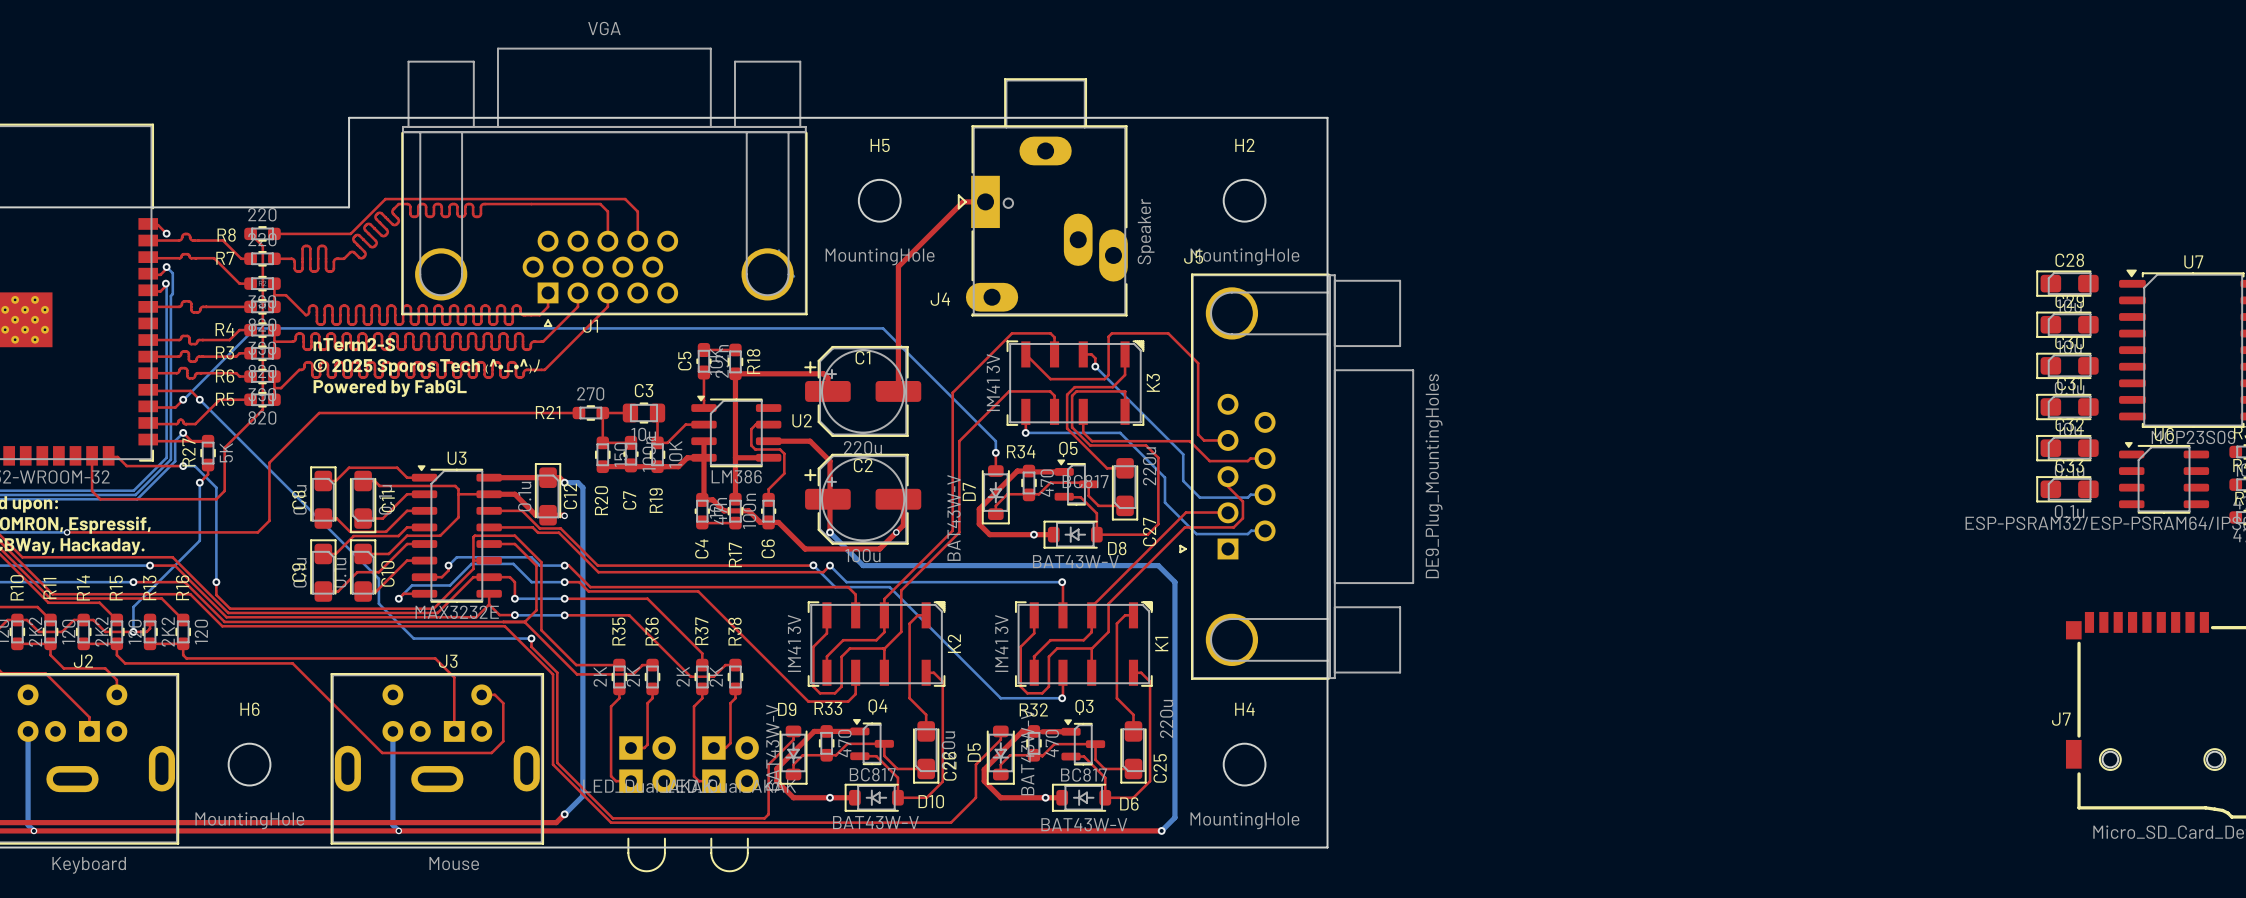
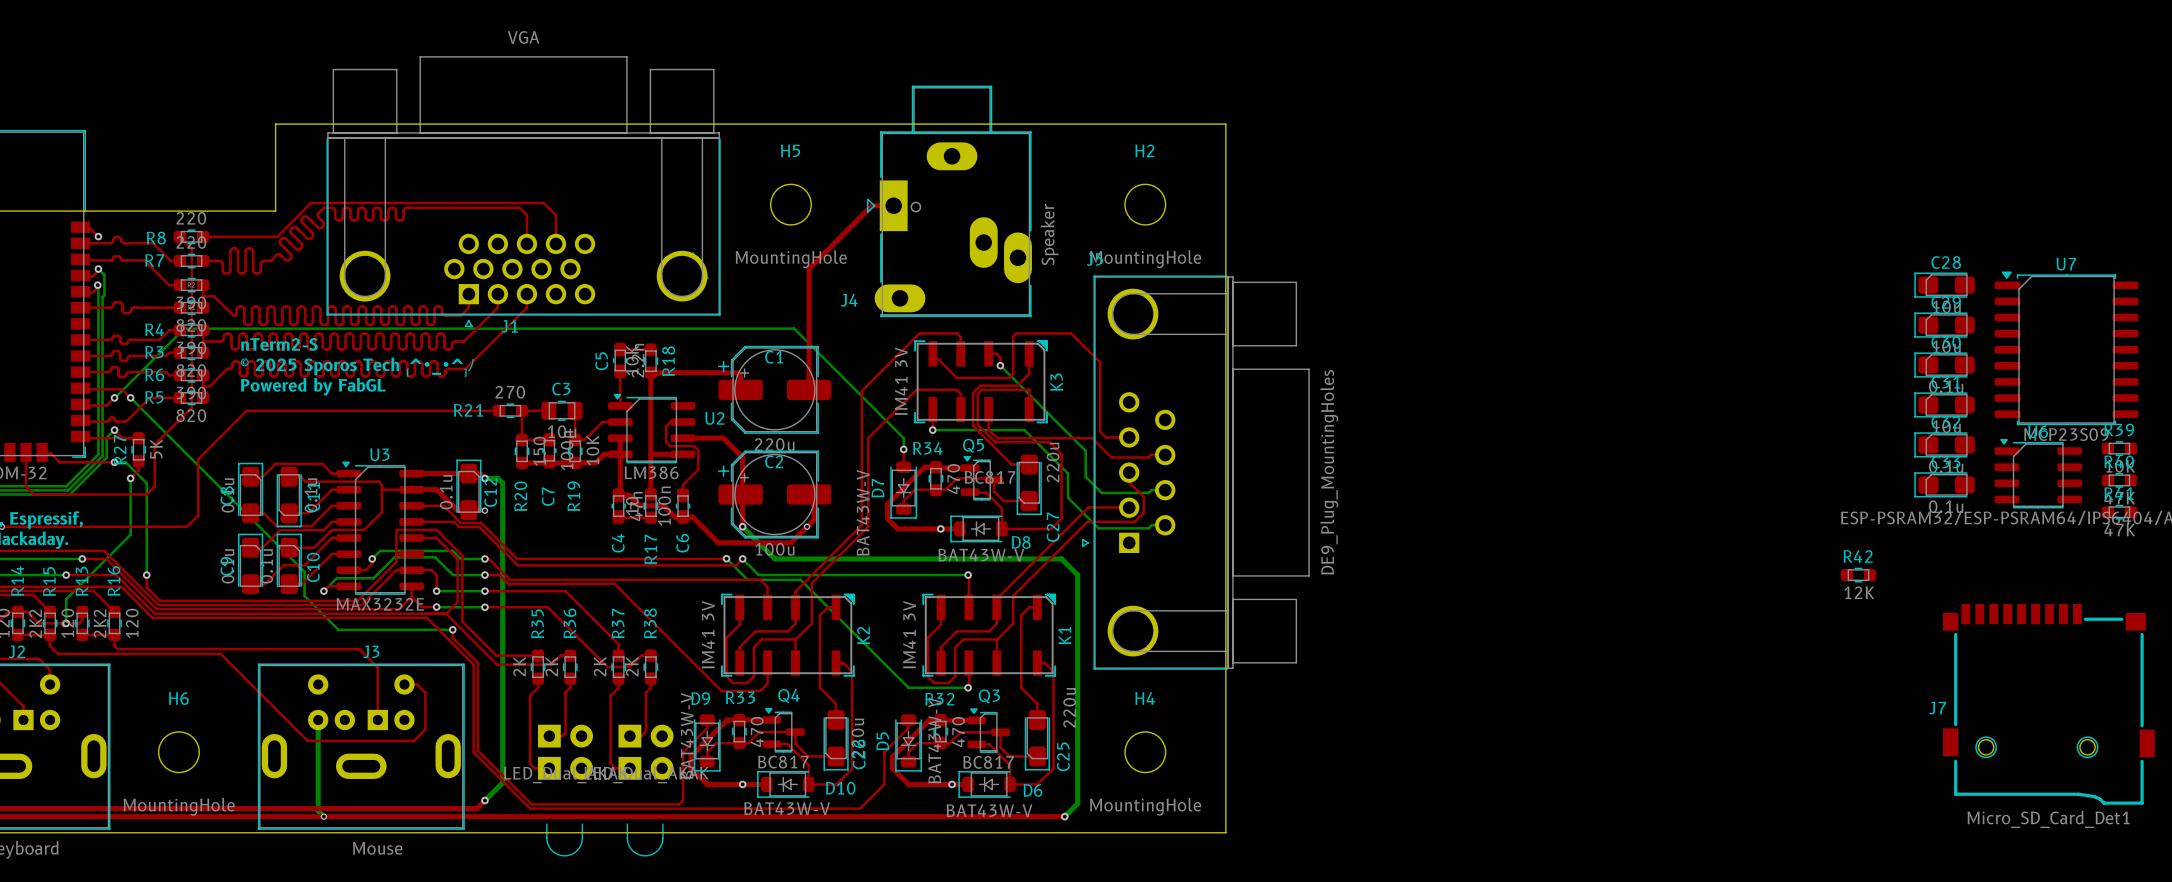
R42: none -> 12K (1858, 575)

